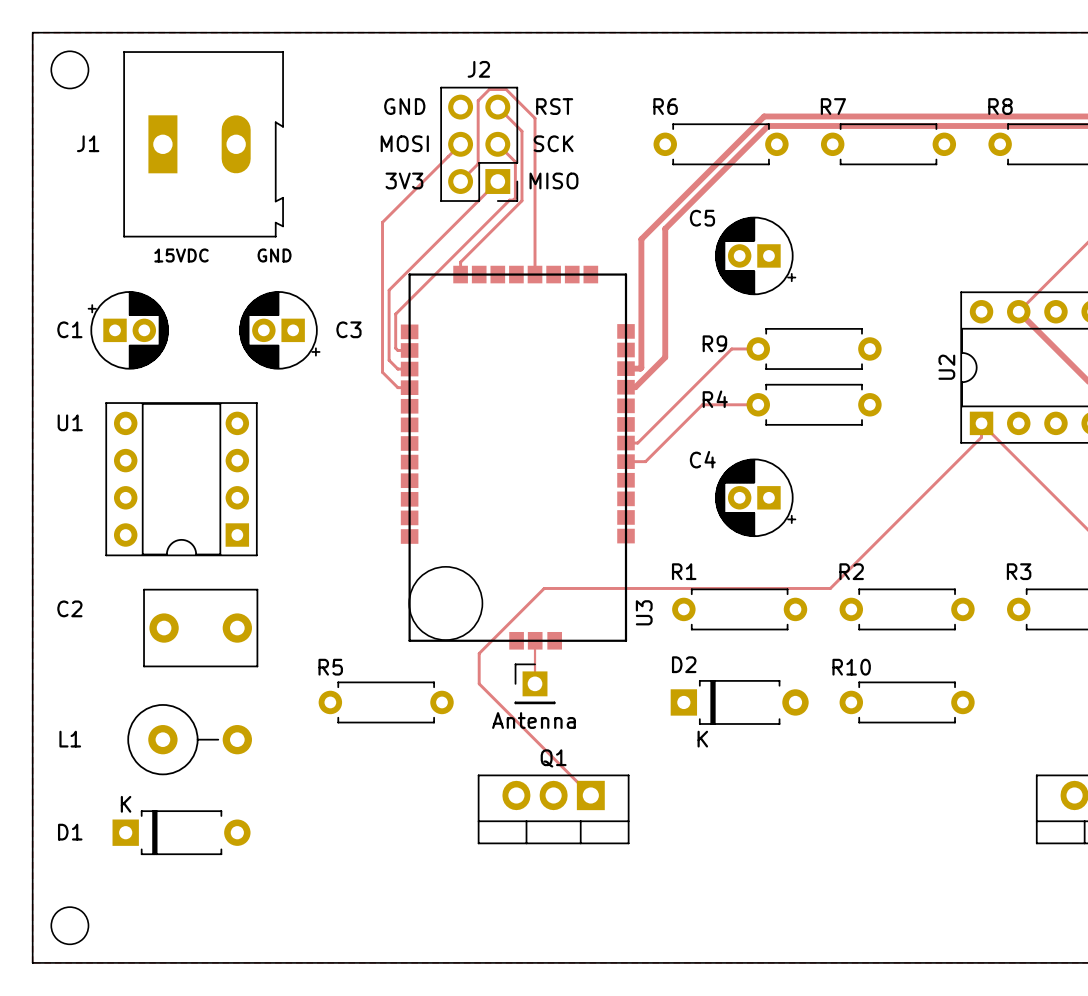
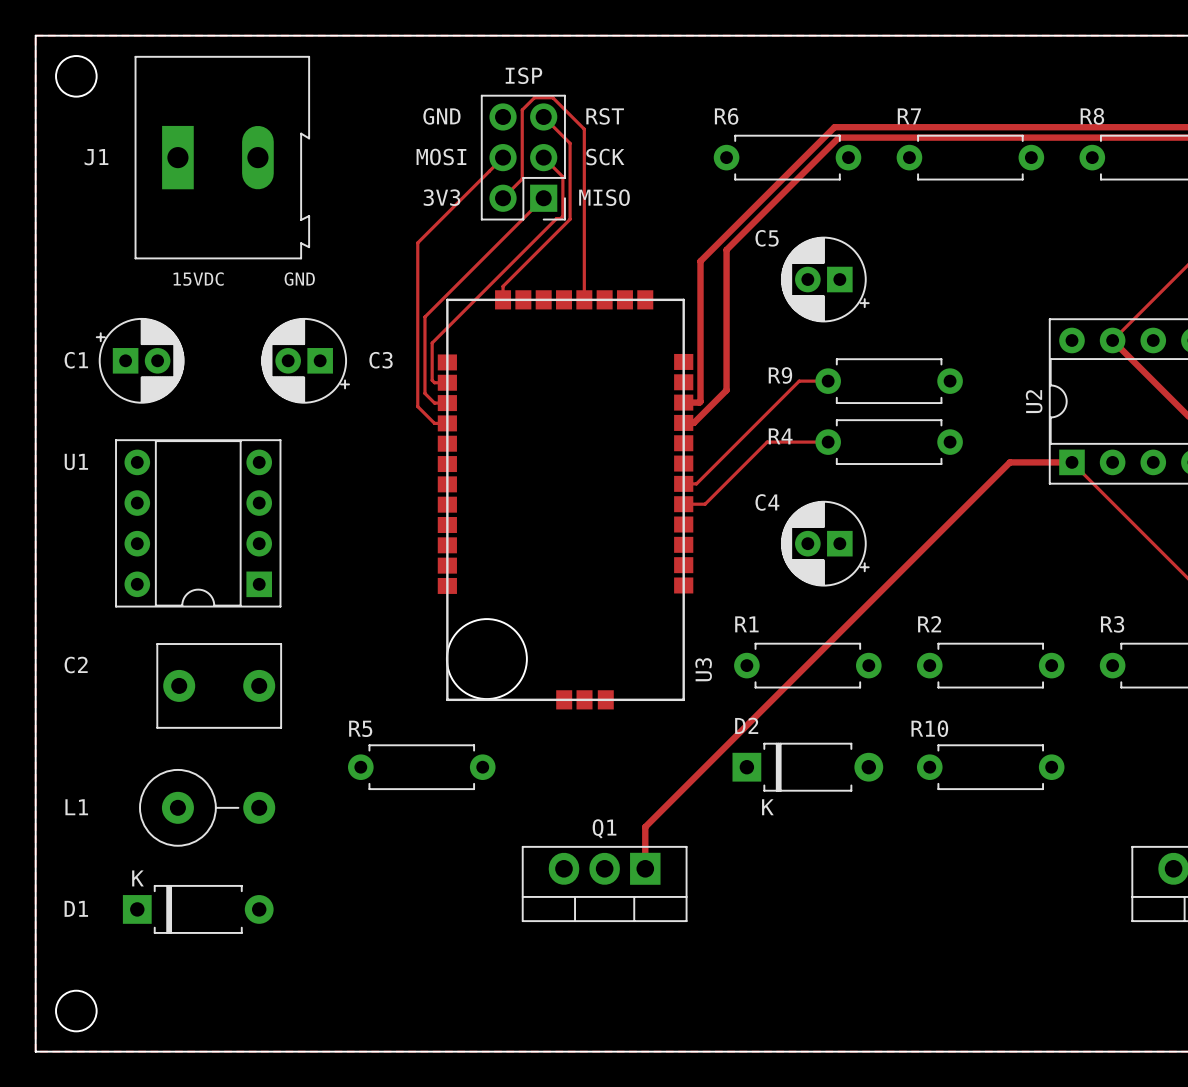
J2 name: J2 (478, 69) -> ISP (523, 75)
track: (981, 423) (981, 437) (830, 588) (544, 588) (479, 653) (479, 683) (590, 795) -> (1071, 462) (1009, 462) (645, 827) (645, 868)
track: (535, 640) (535, 683) -> none
Antenna: (535, 683) -> none

